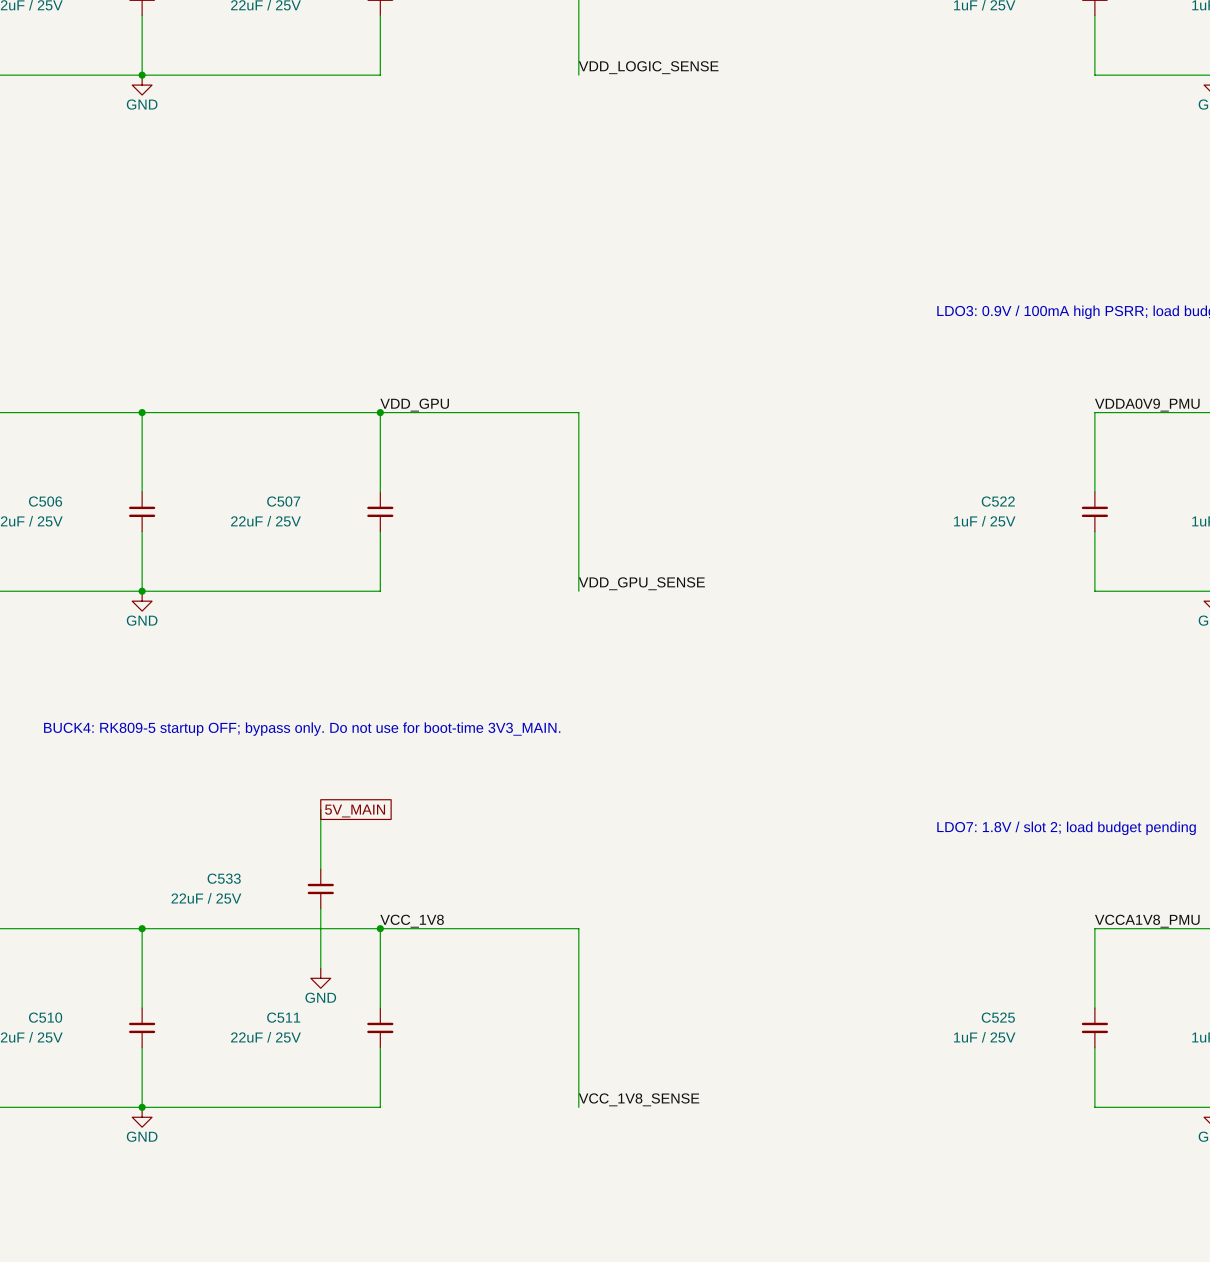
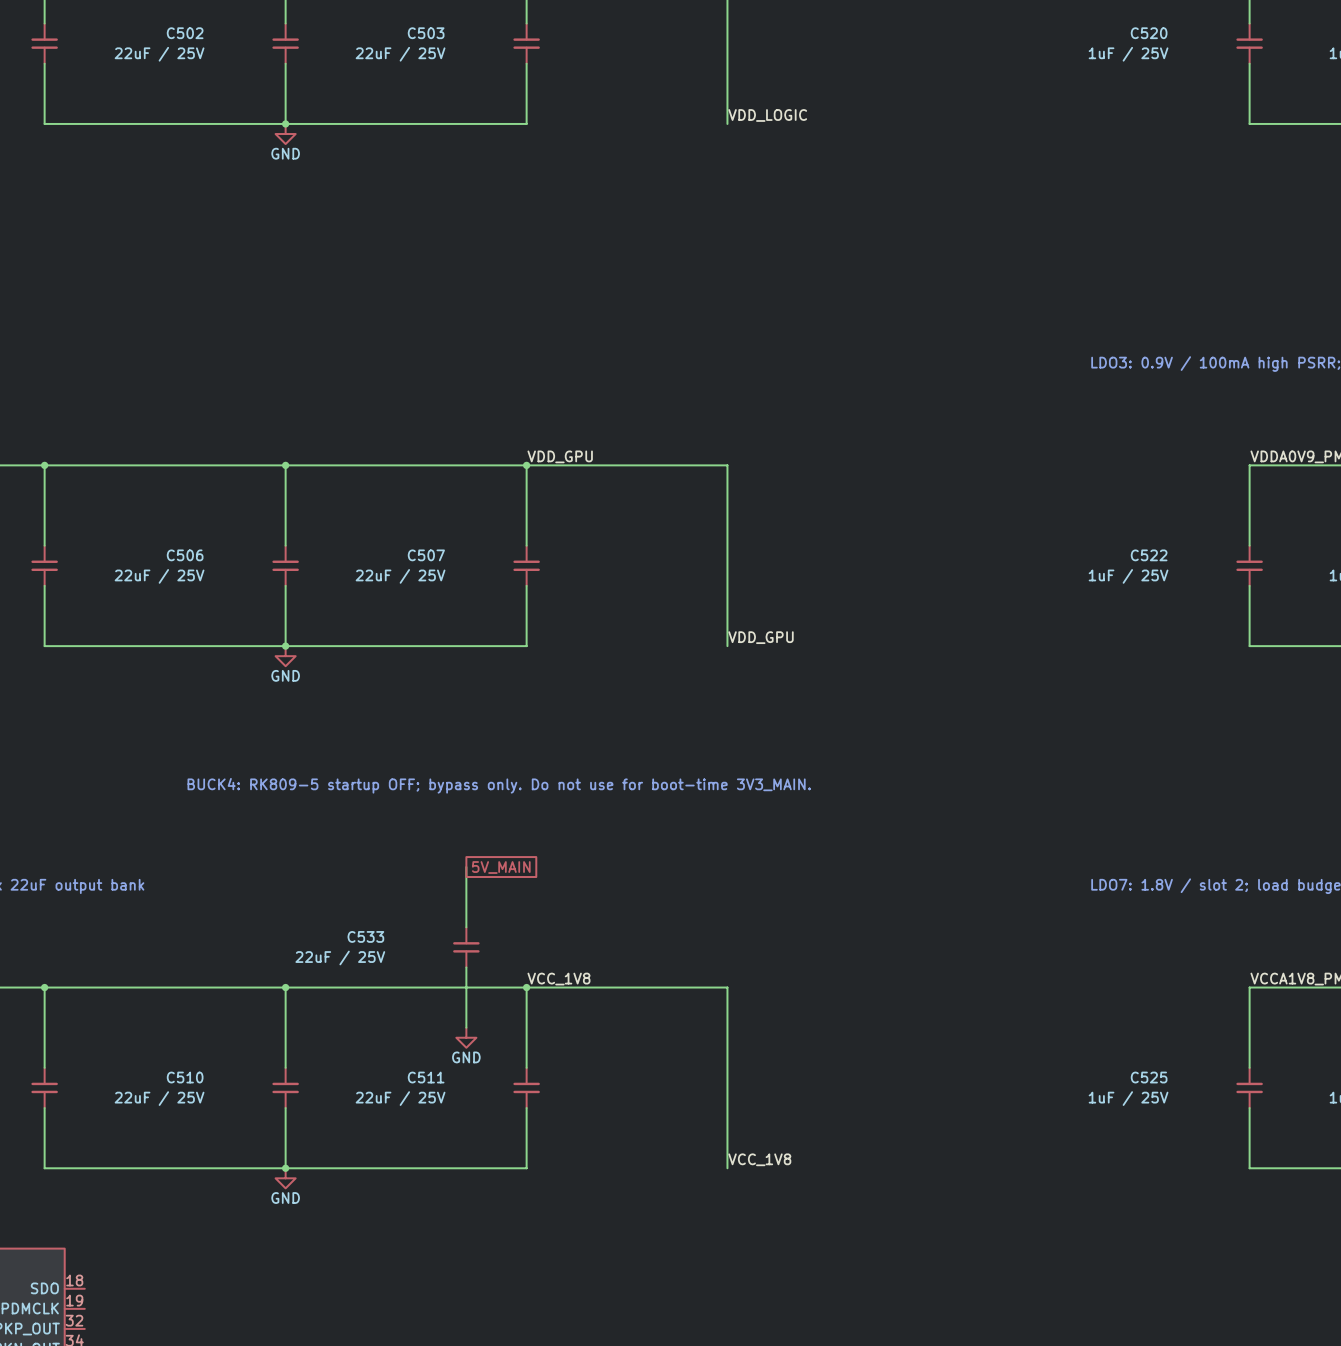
label: VDD_LOGIC_SENSE (648, 67) -> VDD_LOGIC (767, 115)
label: VDD_GPU_SENSE (641, 583) -> VDD_GPU (761, 637)
label: VCC_1V8_SENSE (639, 1099) -> VCC_1V8 (759, 1159)

